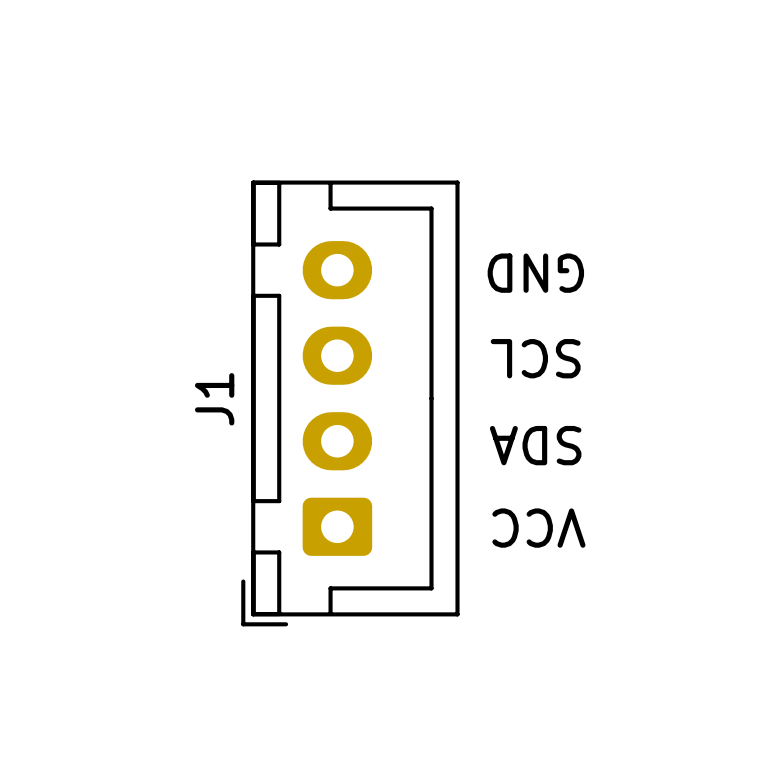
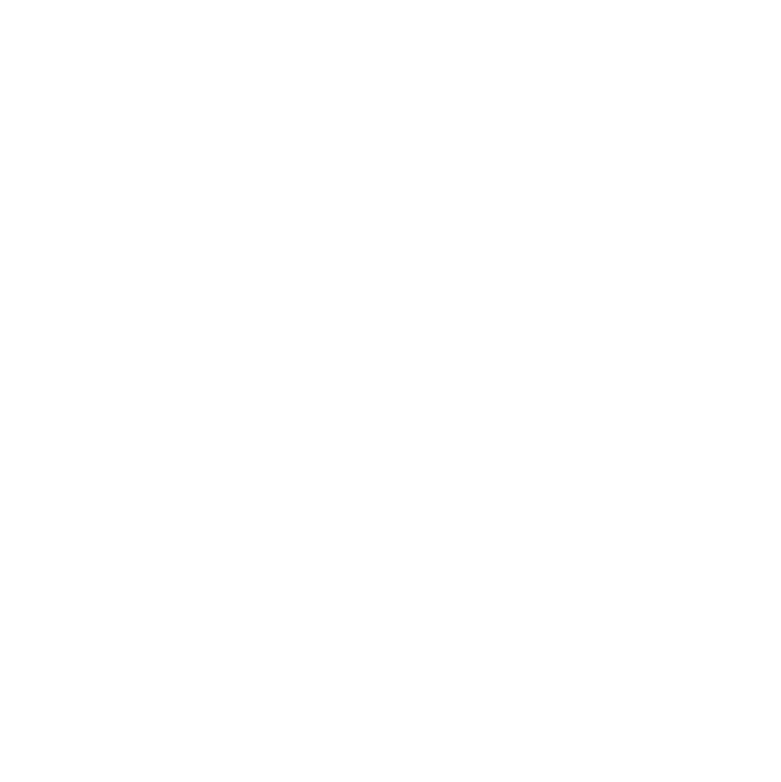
J1: (350, 403) -> none

